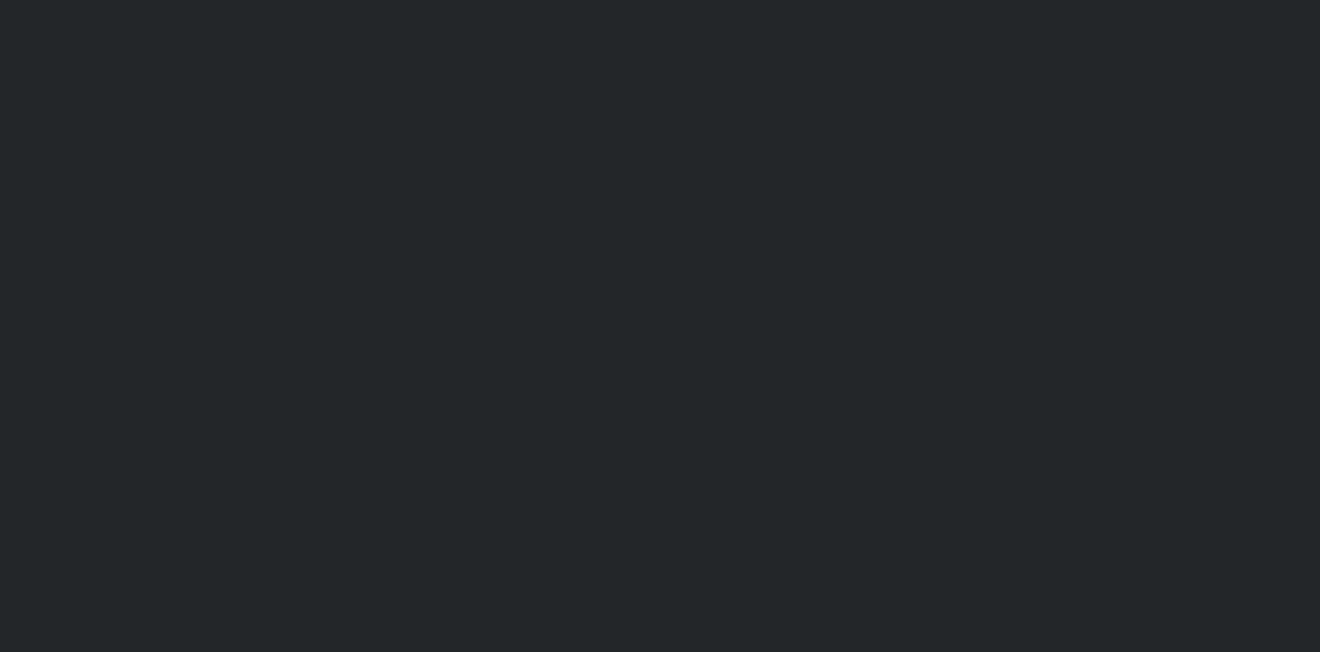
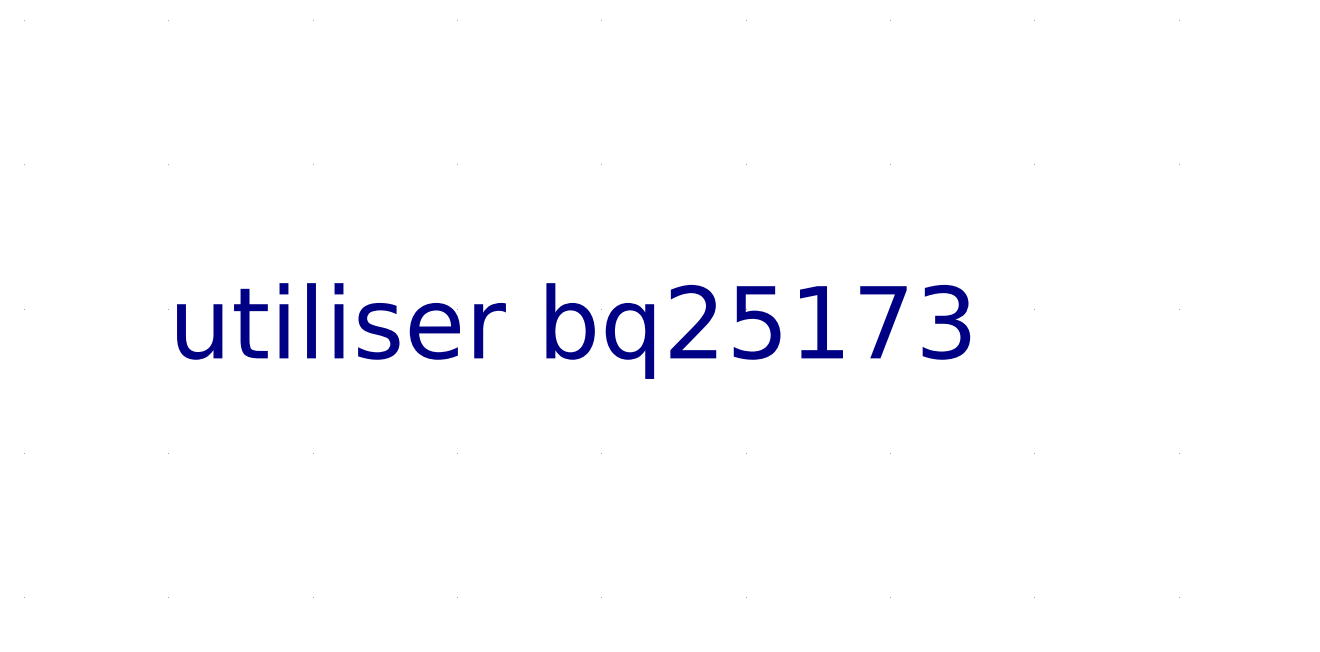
text: none -> utiliser bq25173 (573, 331)

